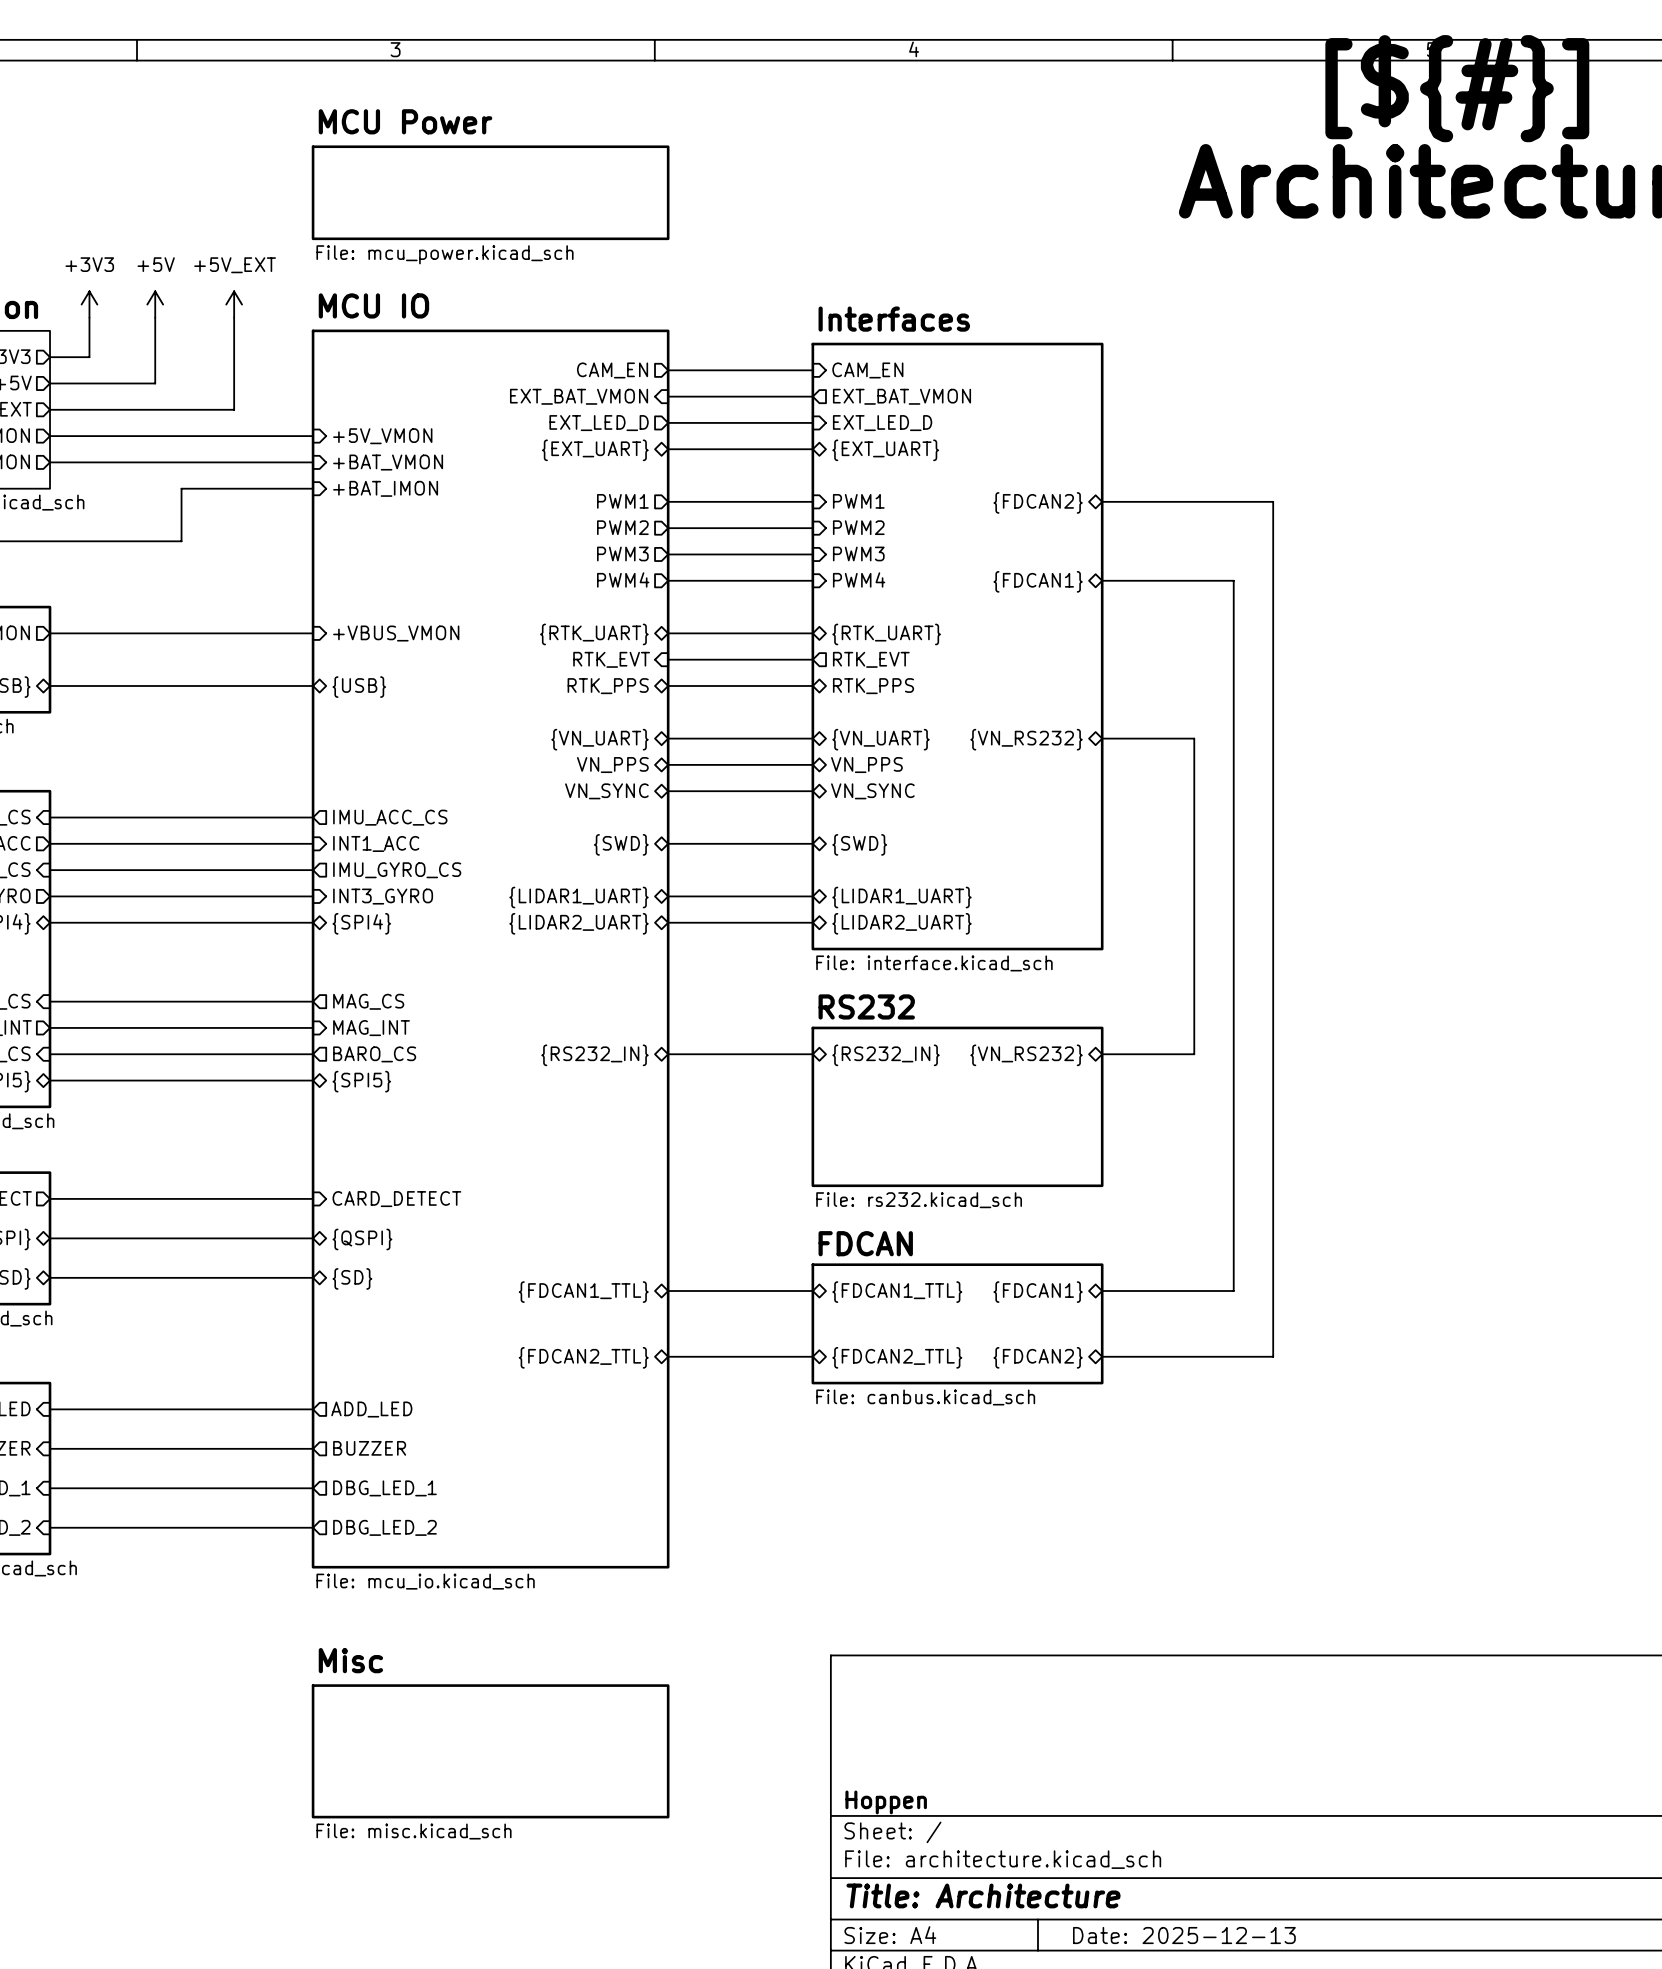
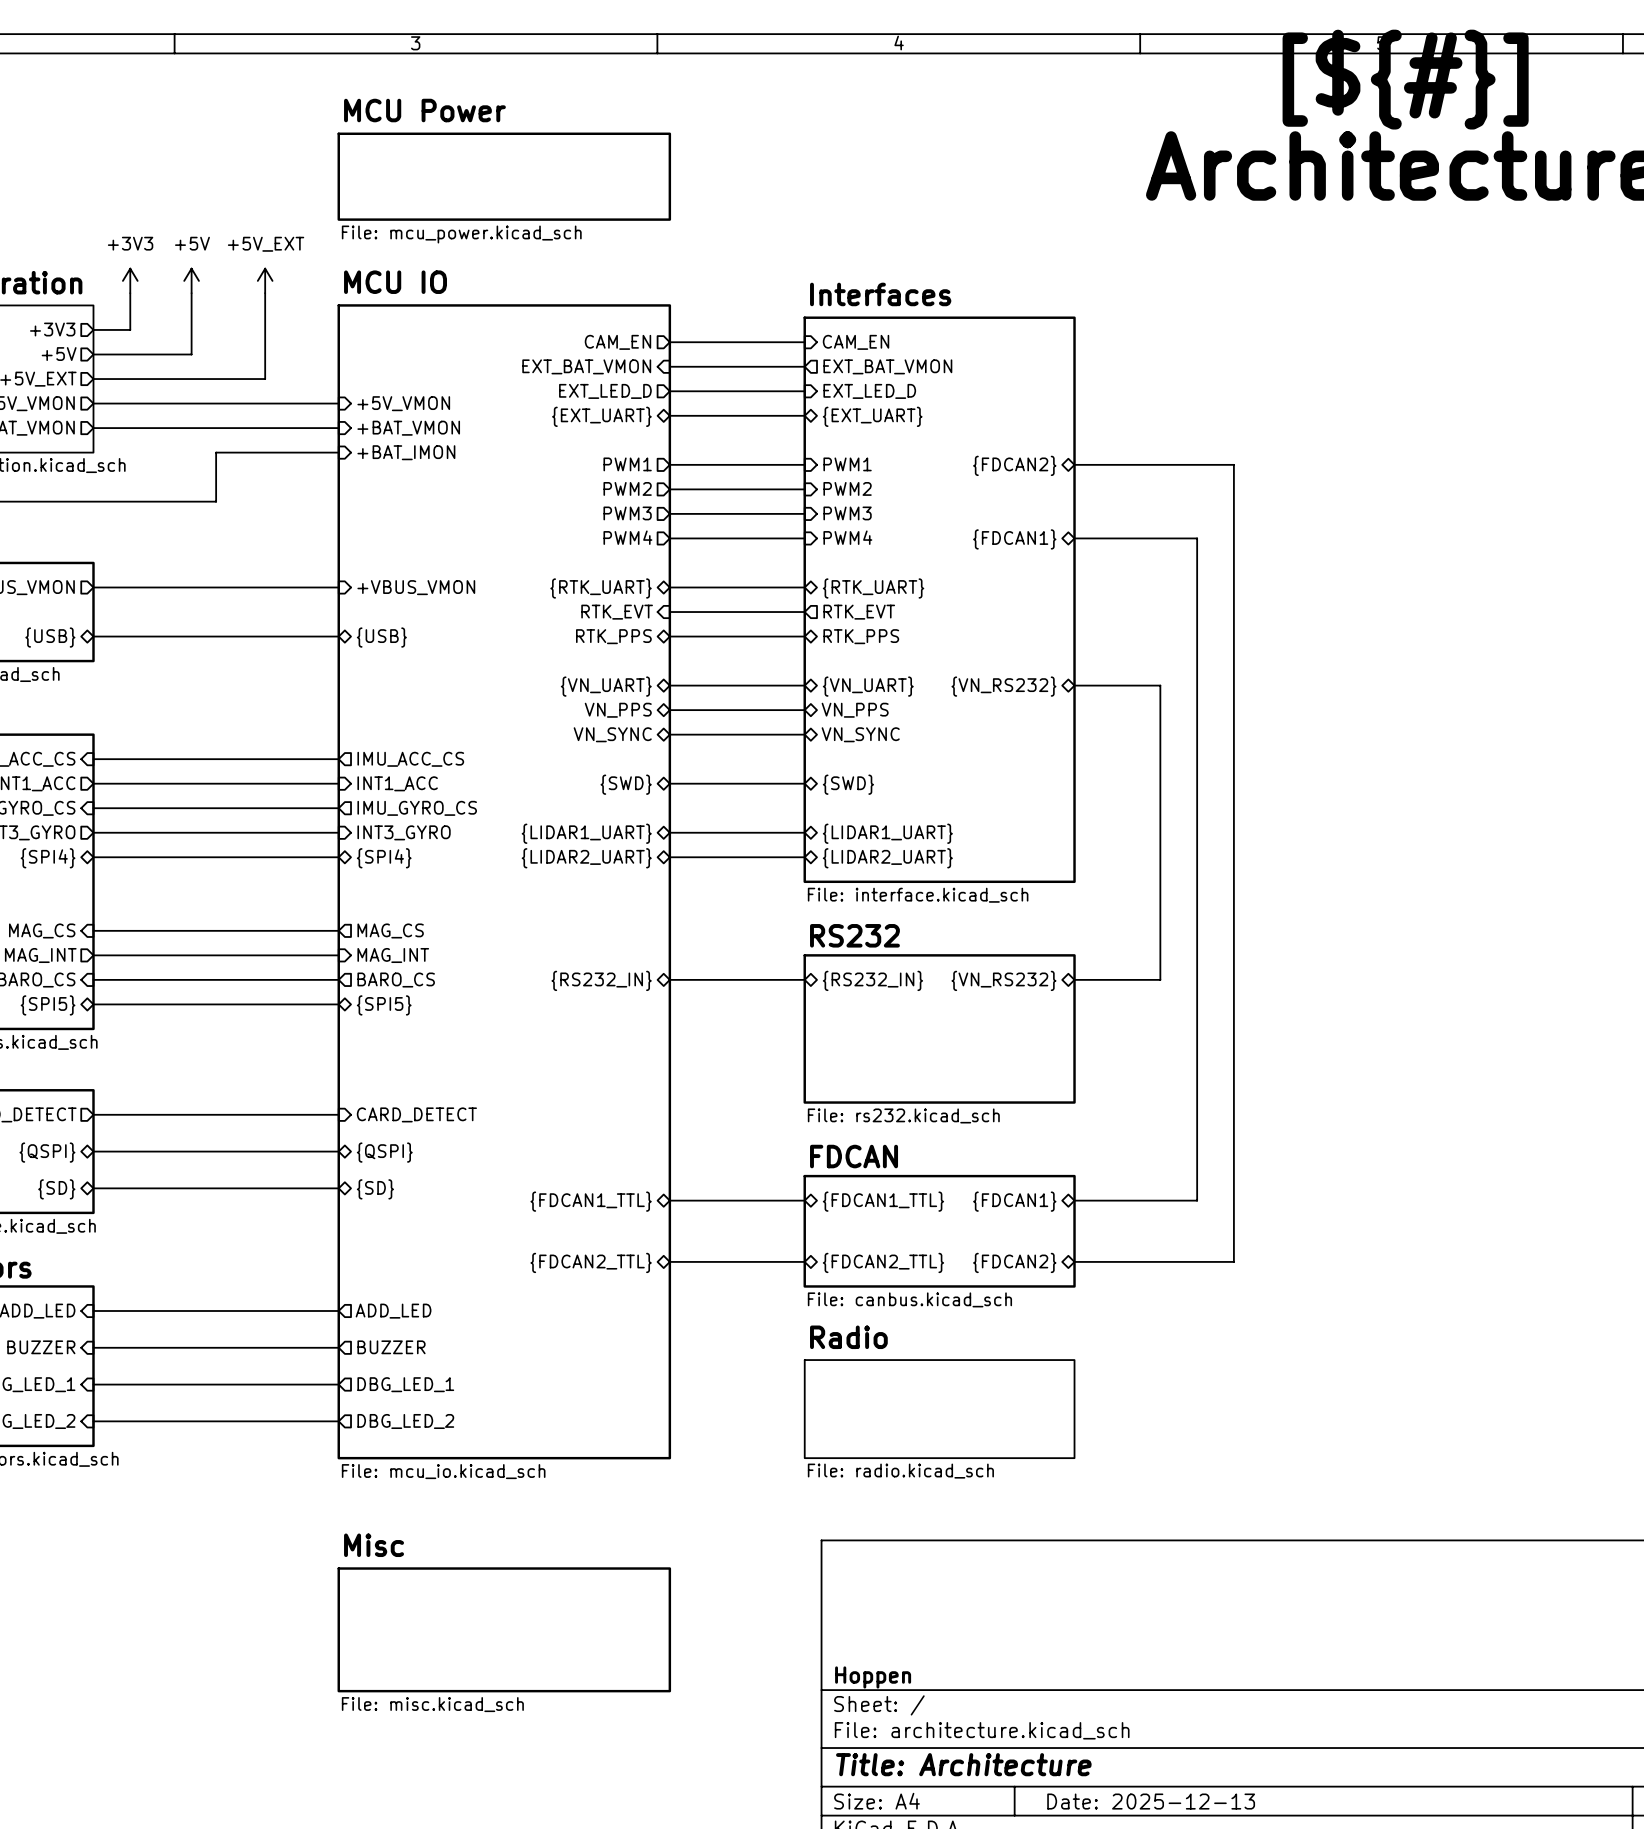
sheet Radio: none -> File: radio.kicad_sch (939, 1409)

